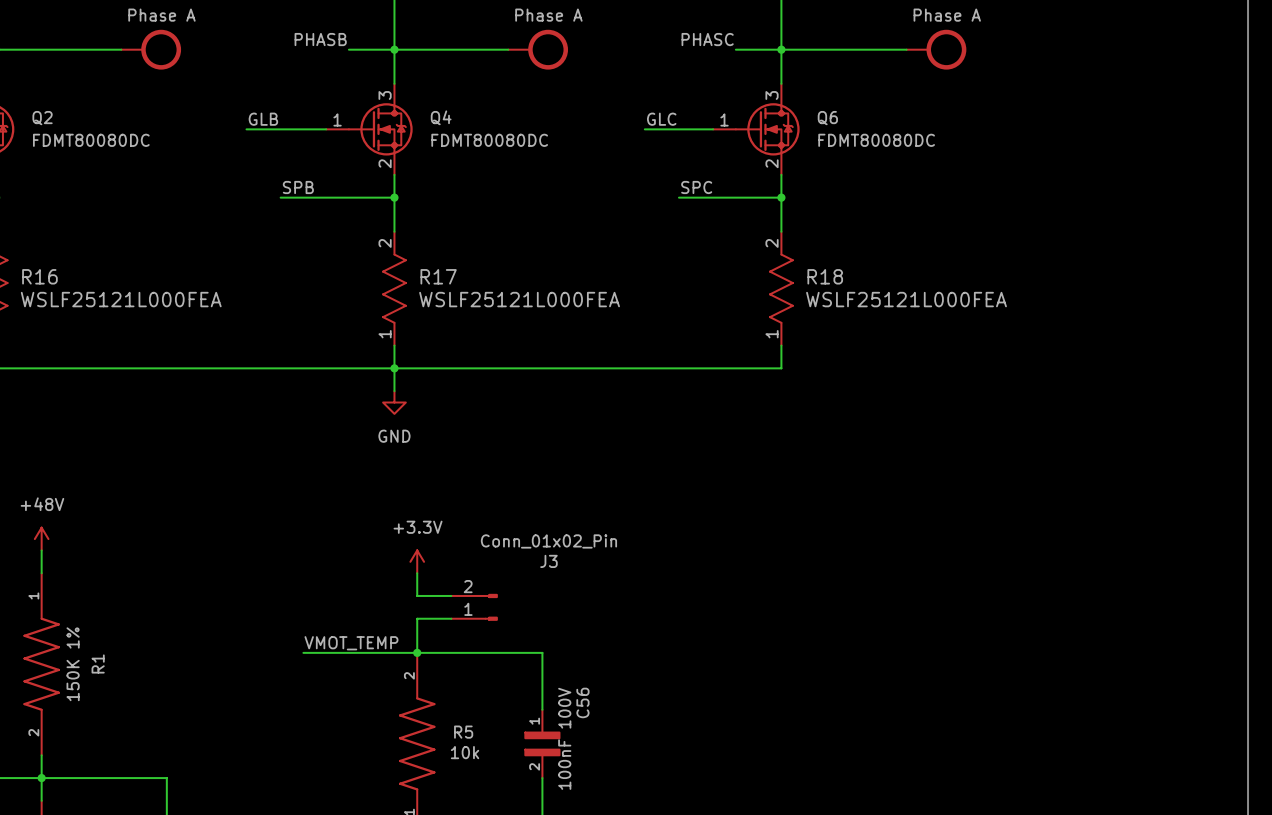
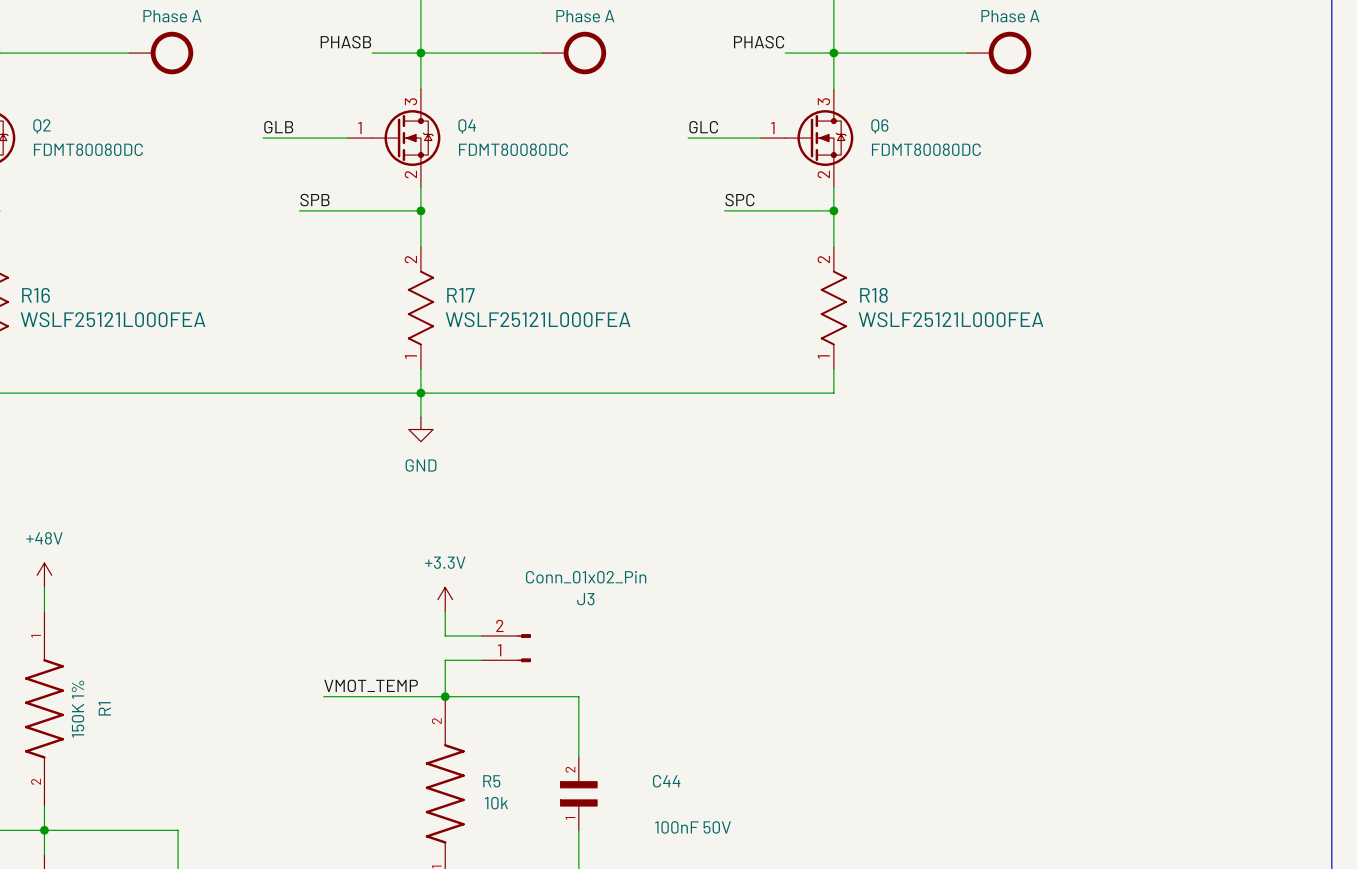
C56 name: C56 (582, 702) -> C44 (666, 781)
C56 value: 100nF 100V (564, 738) -> 100nF 50V (692, 827)
C56 rotation: 0° (542, 743) -> 180° (578, 793)

